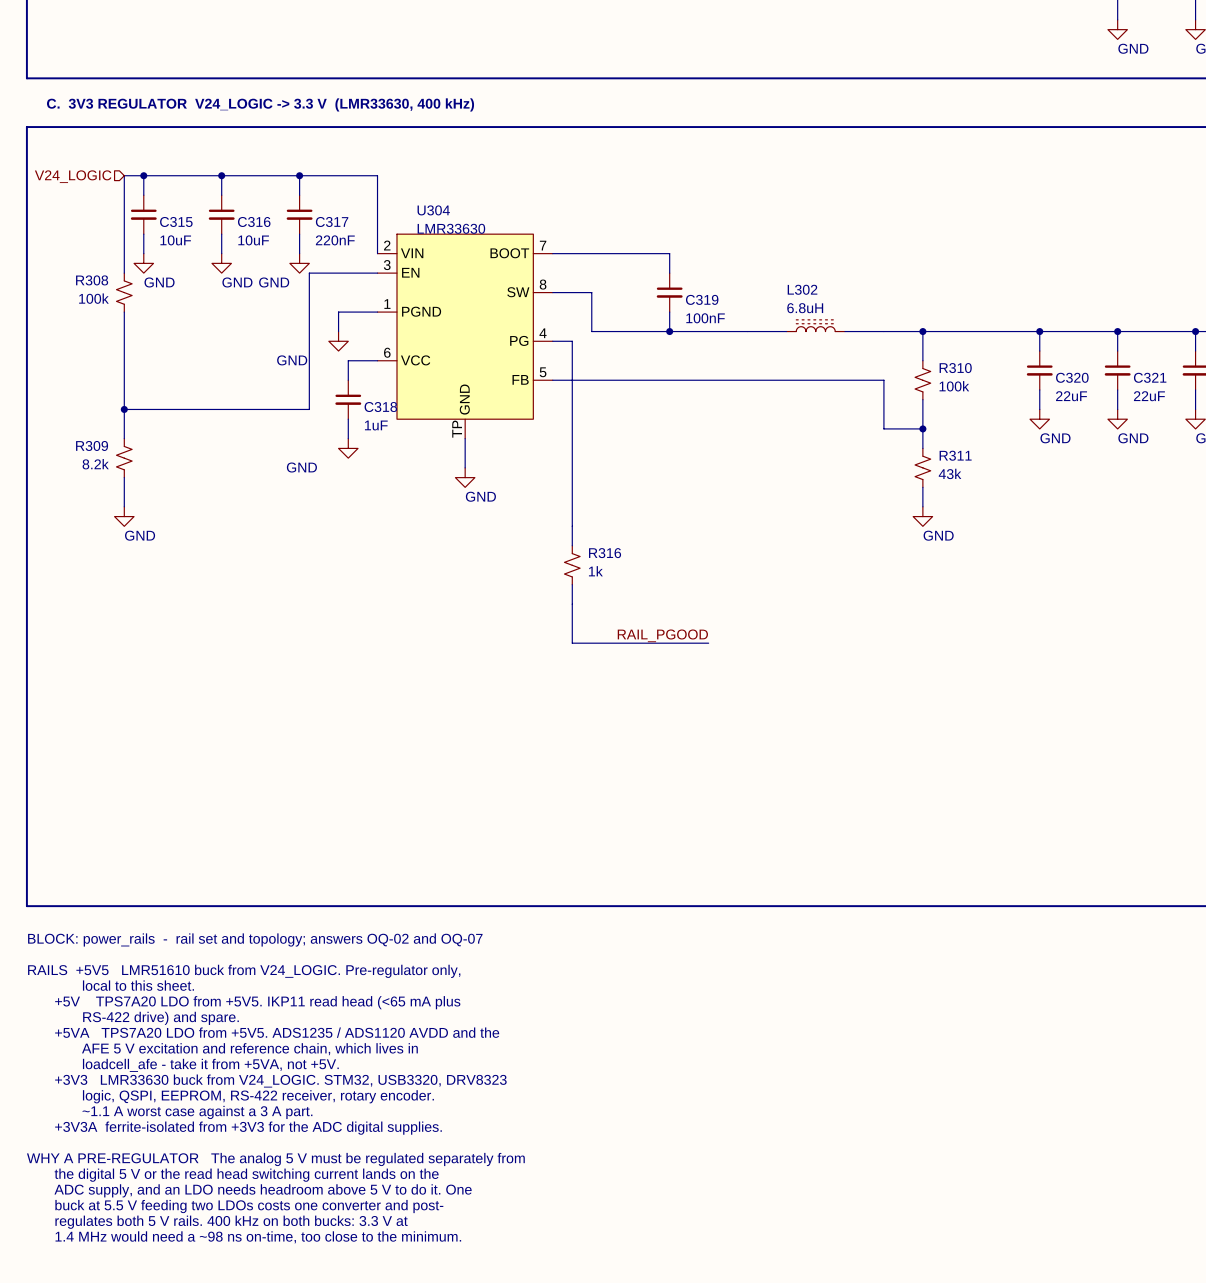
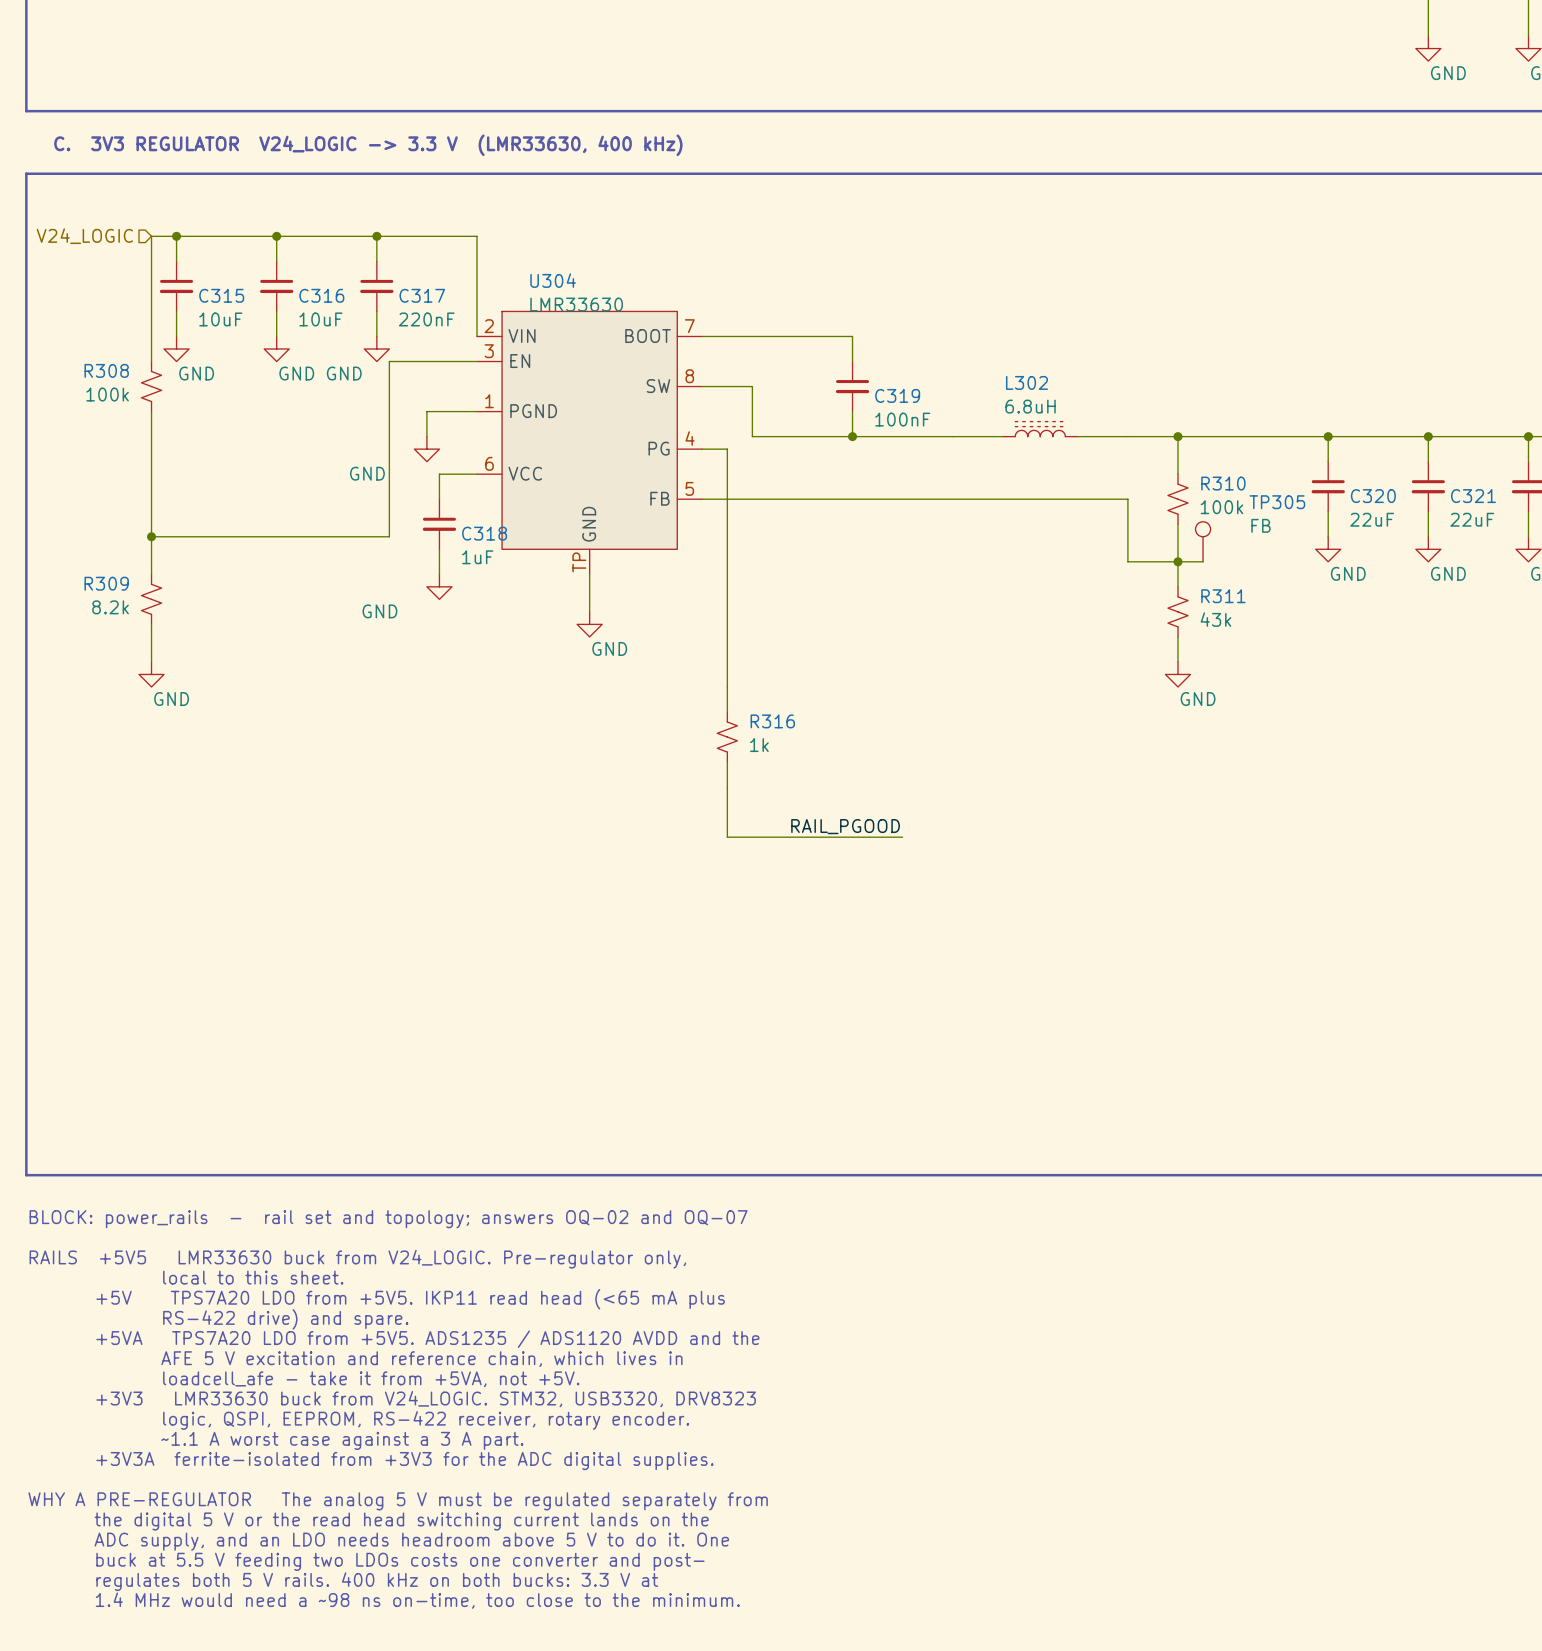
TP305: none -> FB (1203, 541)
wire: none -> (1177, 561) (1203, 561)
text: RAILS +5V5 LMR51610 buck from V24_LOGIC. Pre-regulator only, (244, 971) -> RAILS +5V5 LMR33630 buck from V24_LOGIC. Pre-regulator only, (357, 1259)

